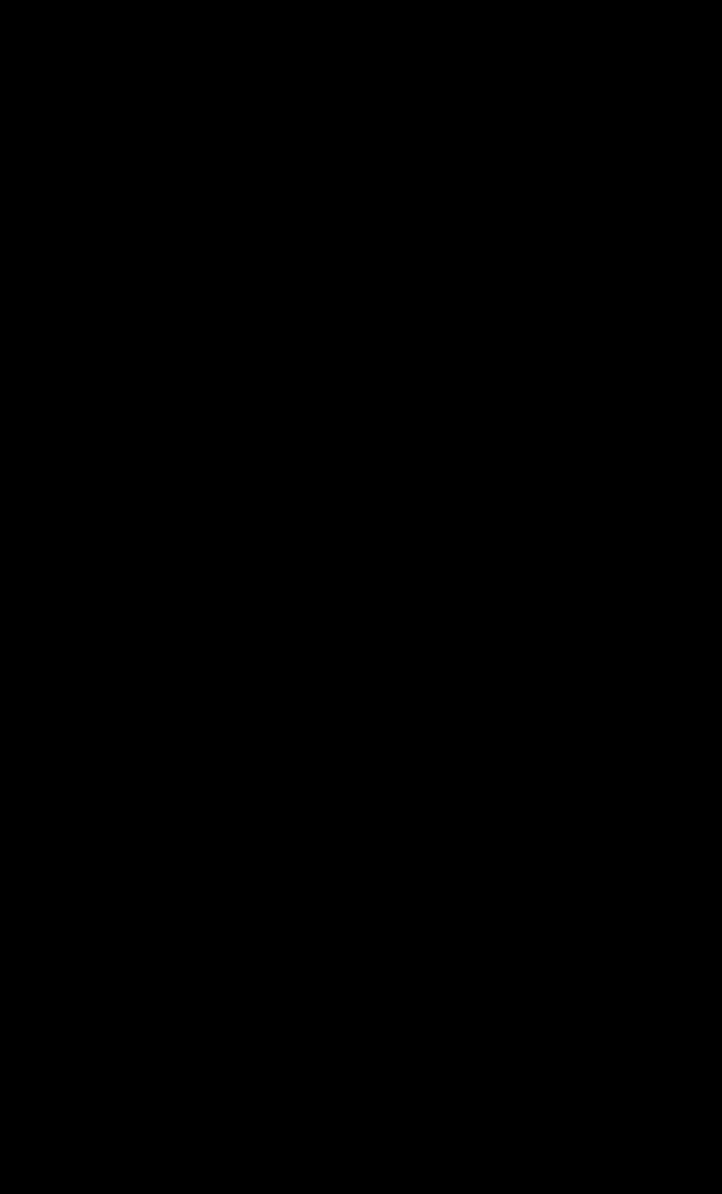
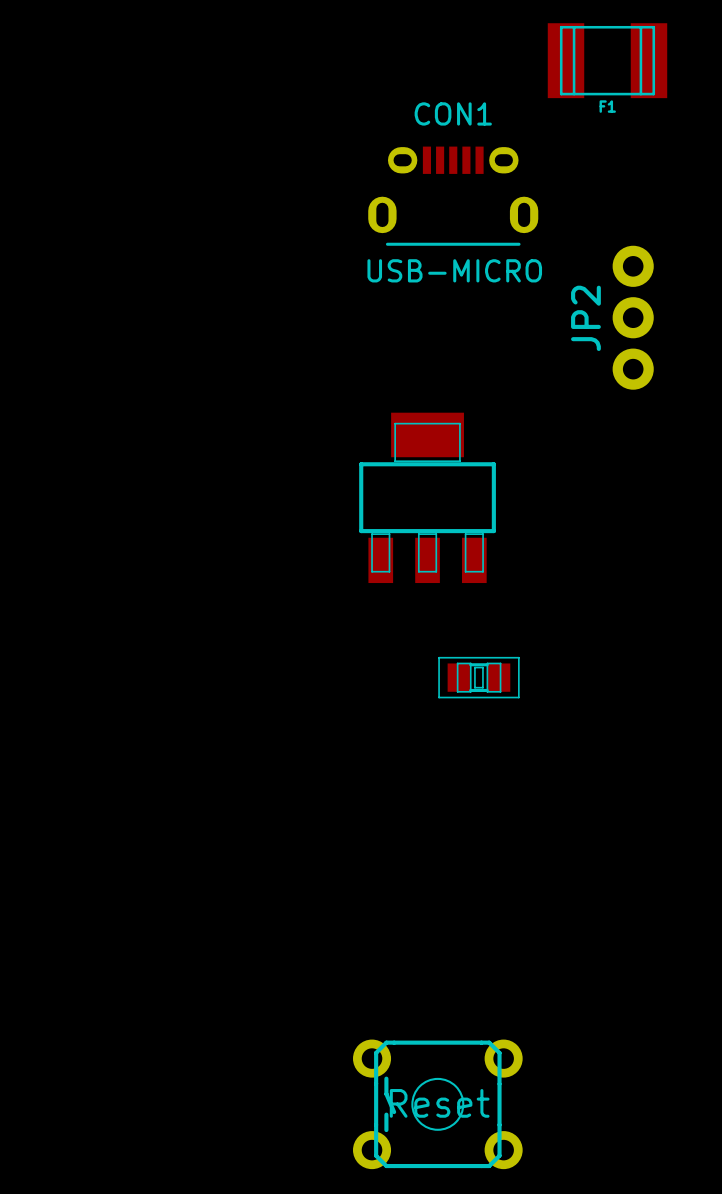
F1: none -> (607, 60)
CON1: none -> USB-MICRO (453, 196)
JP2: none -> (633, 317)
part: none -> (427, 497)
part: none -> (478, 677)
part: none -> Reset (437, 1104)

